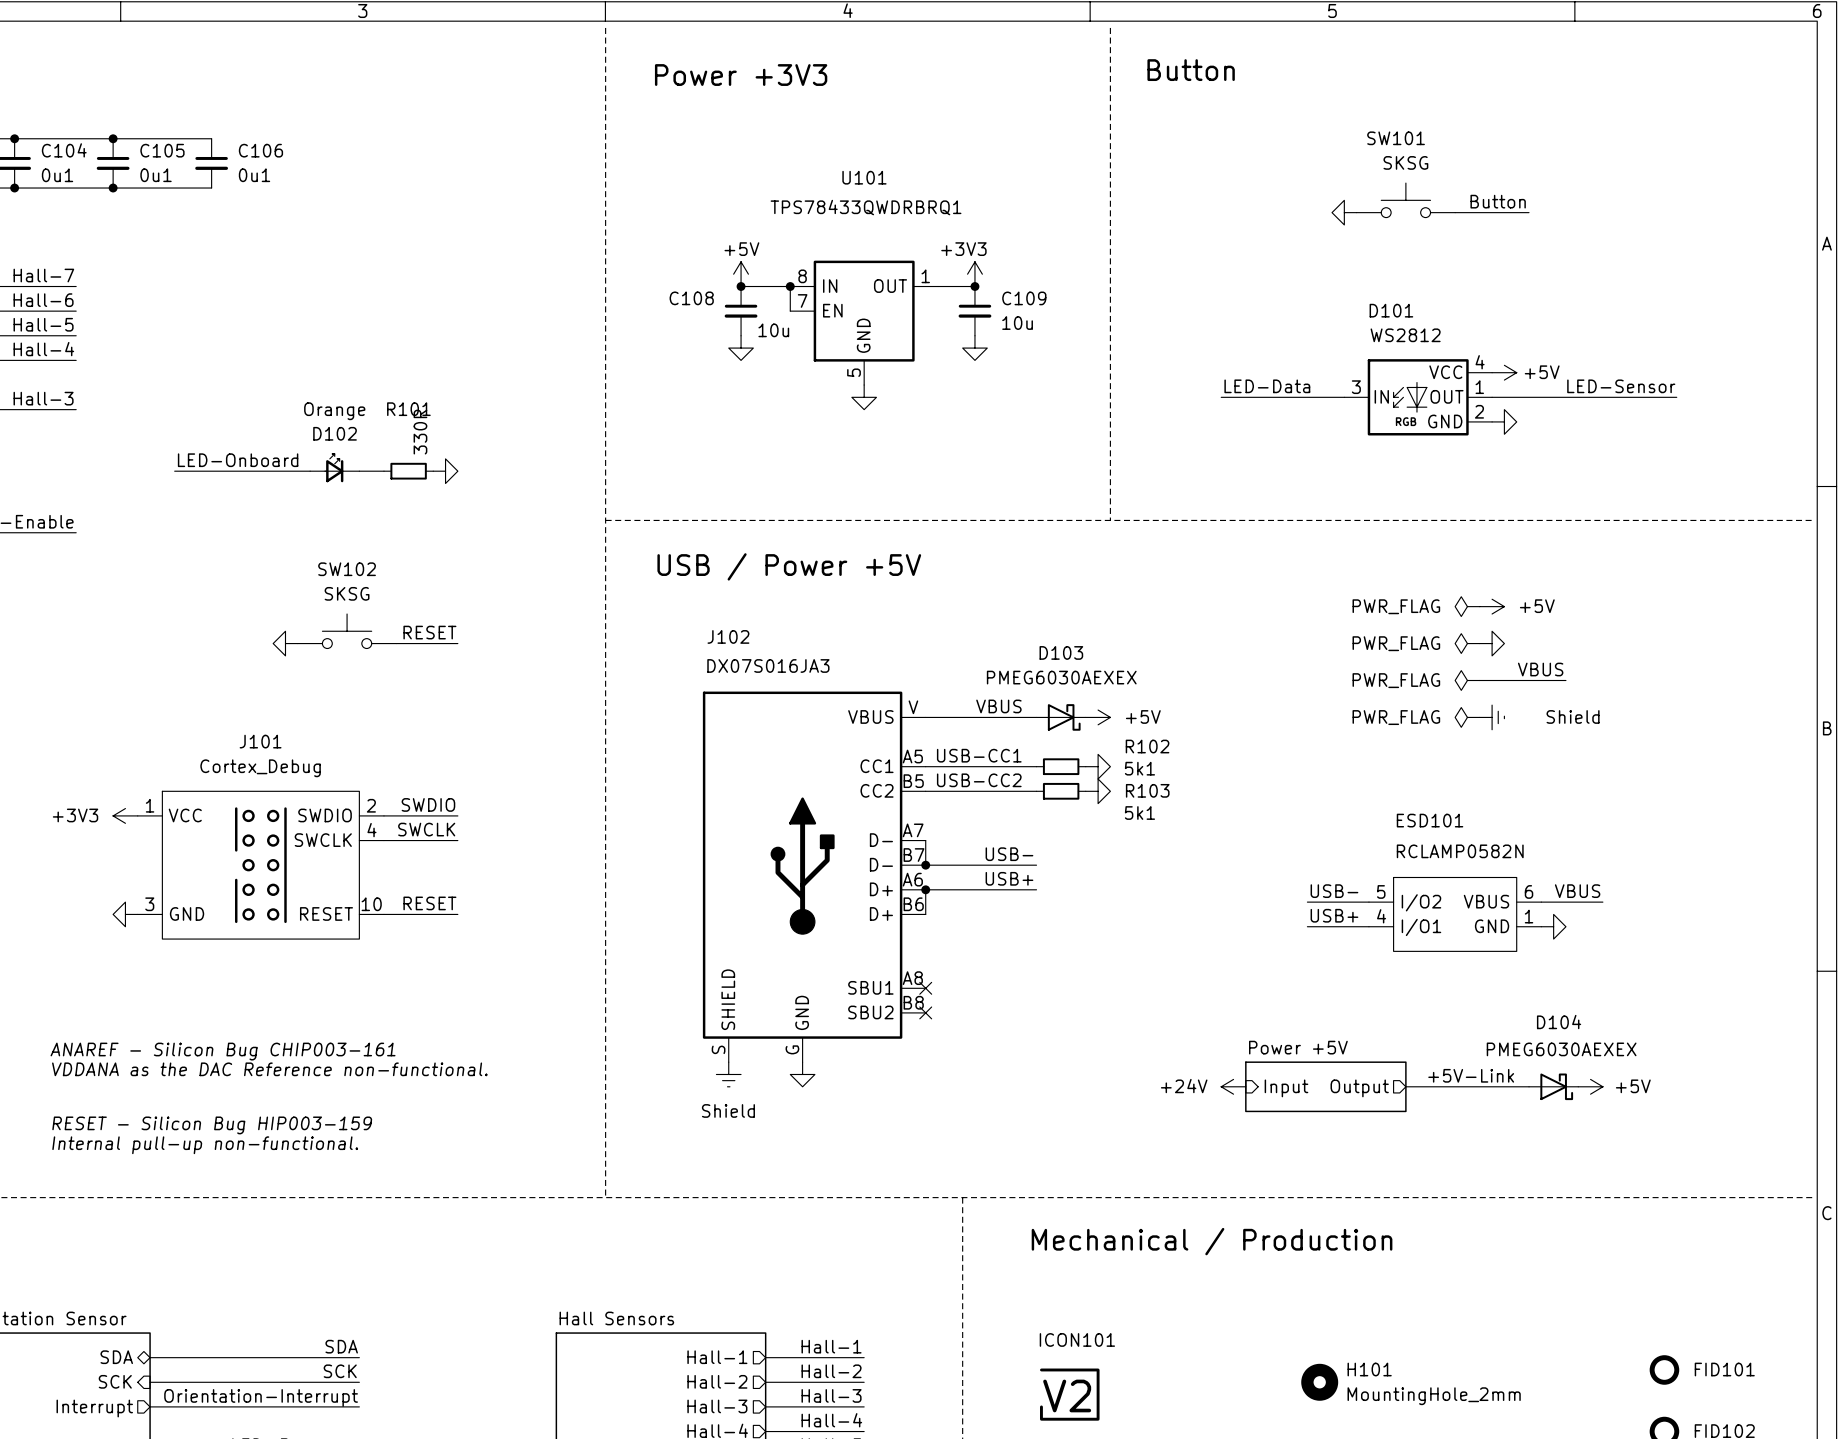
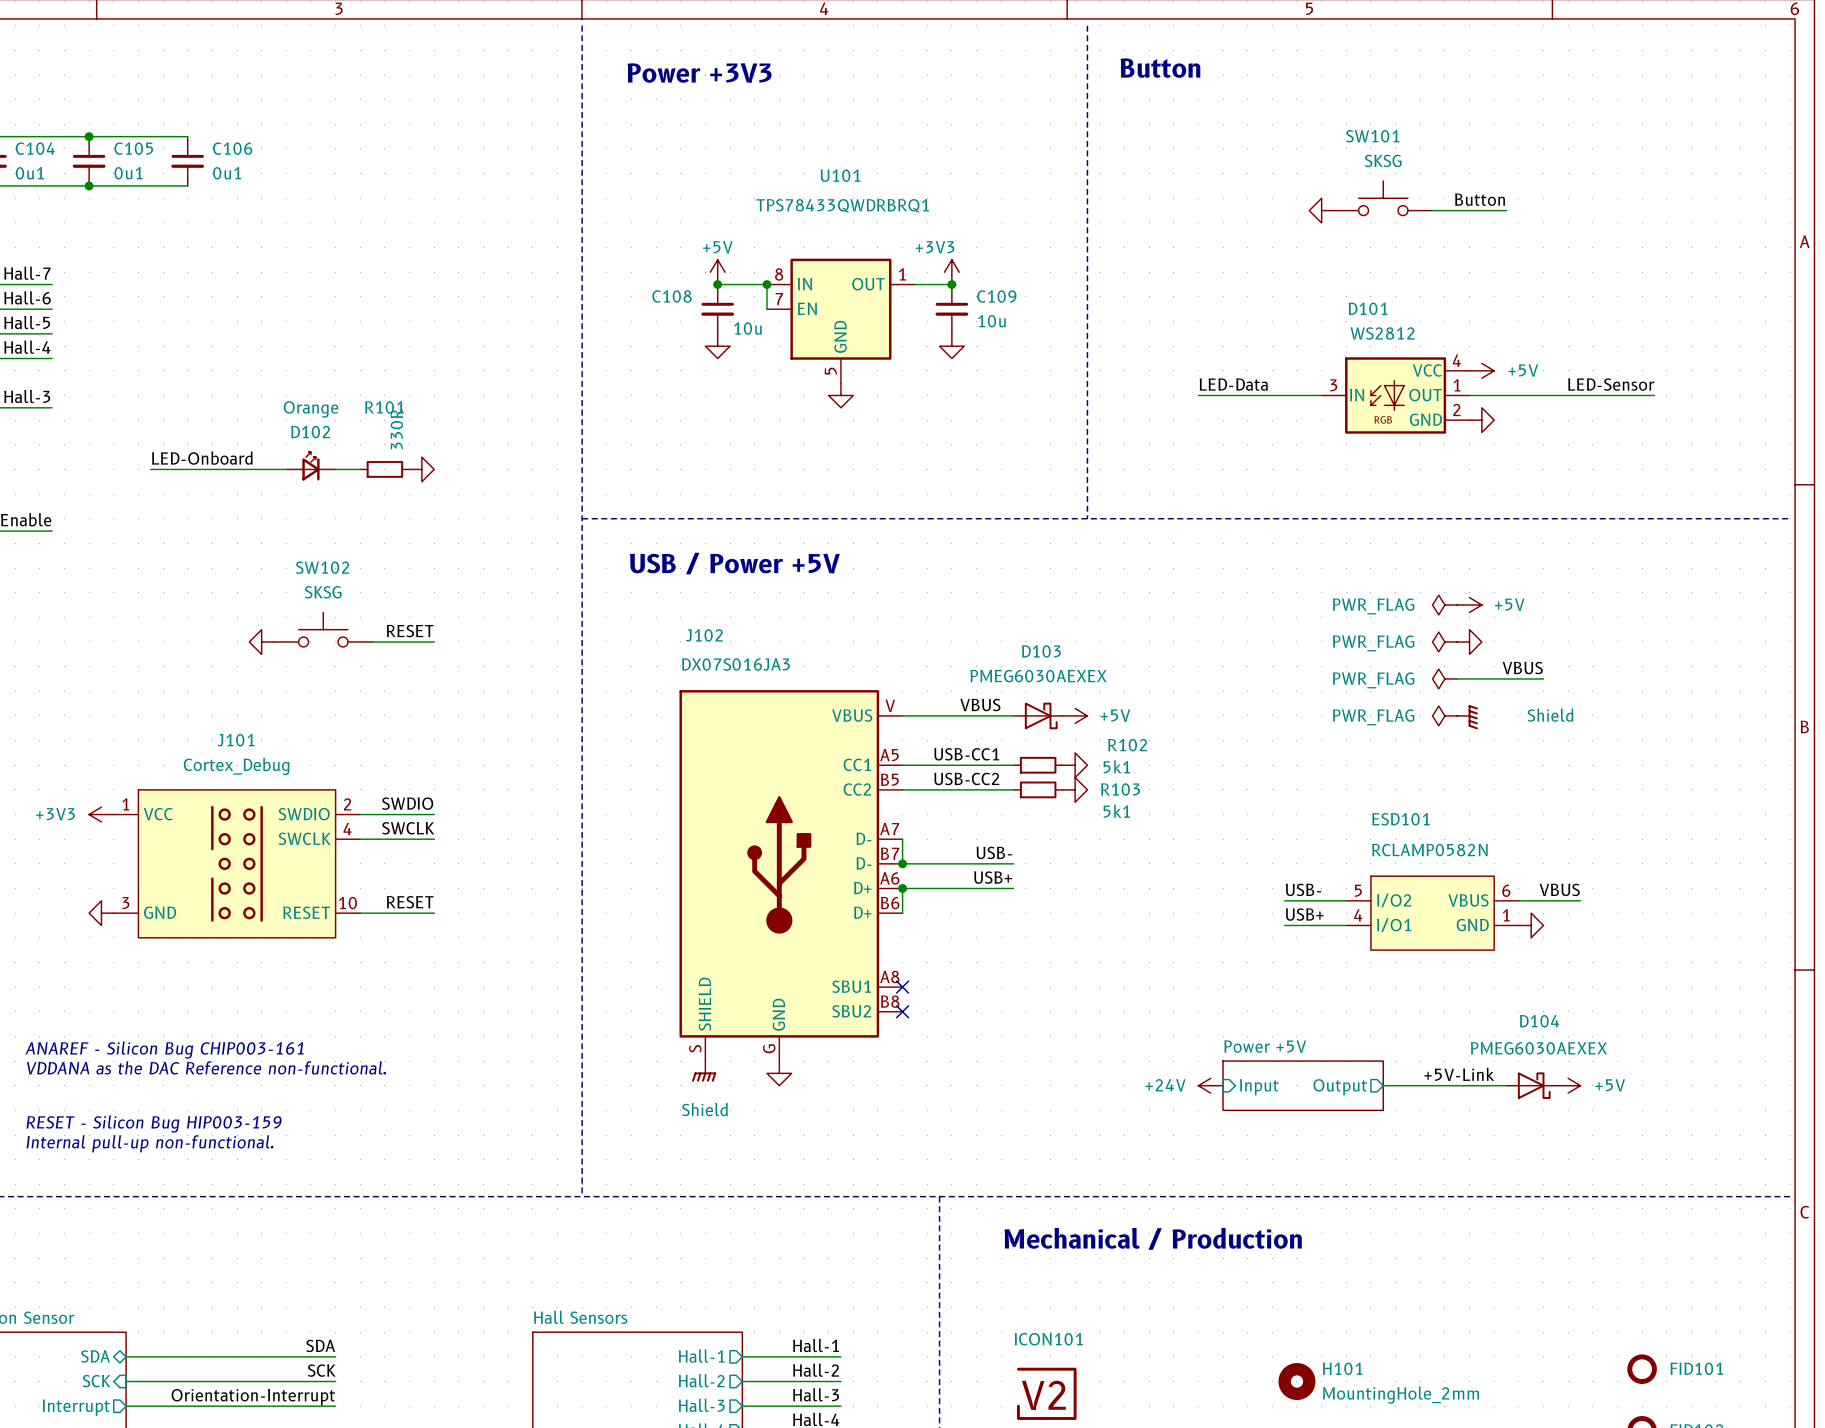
power symbol shape: [1479, 705, 1505, 730] -> [1457, 705, 1478, 730]
power symbol shape: [716, 1062, 742, 1087] -> [692, 1061, 717, 1082]

